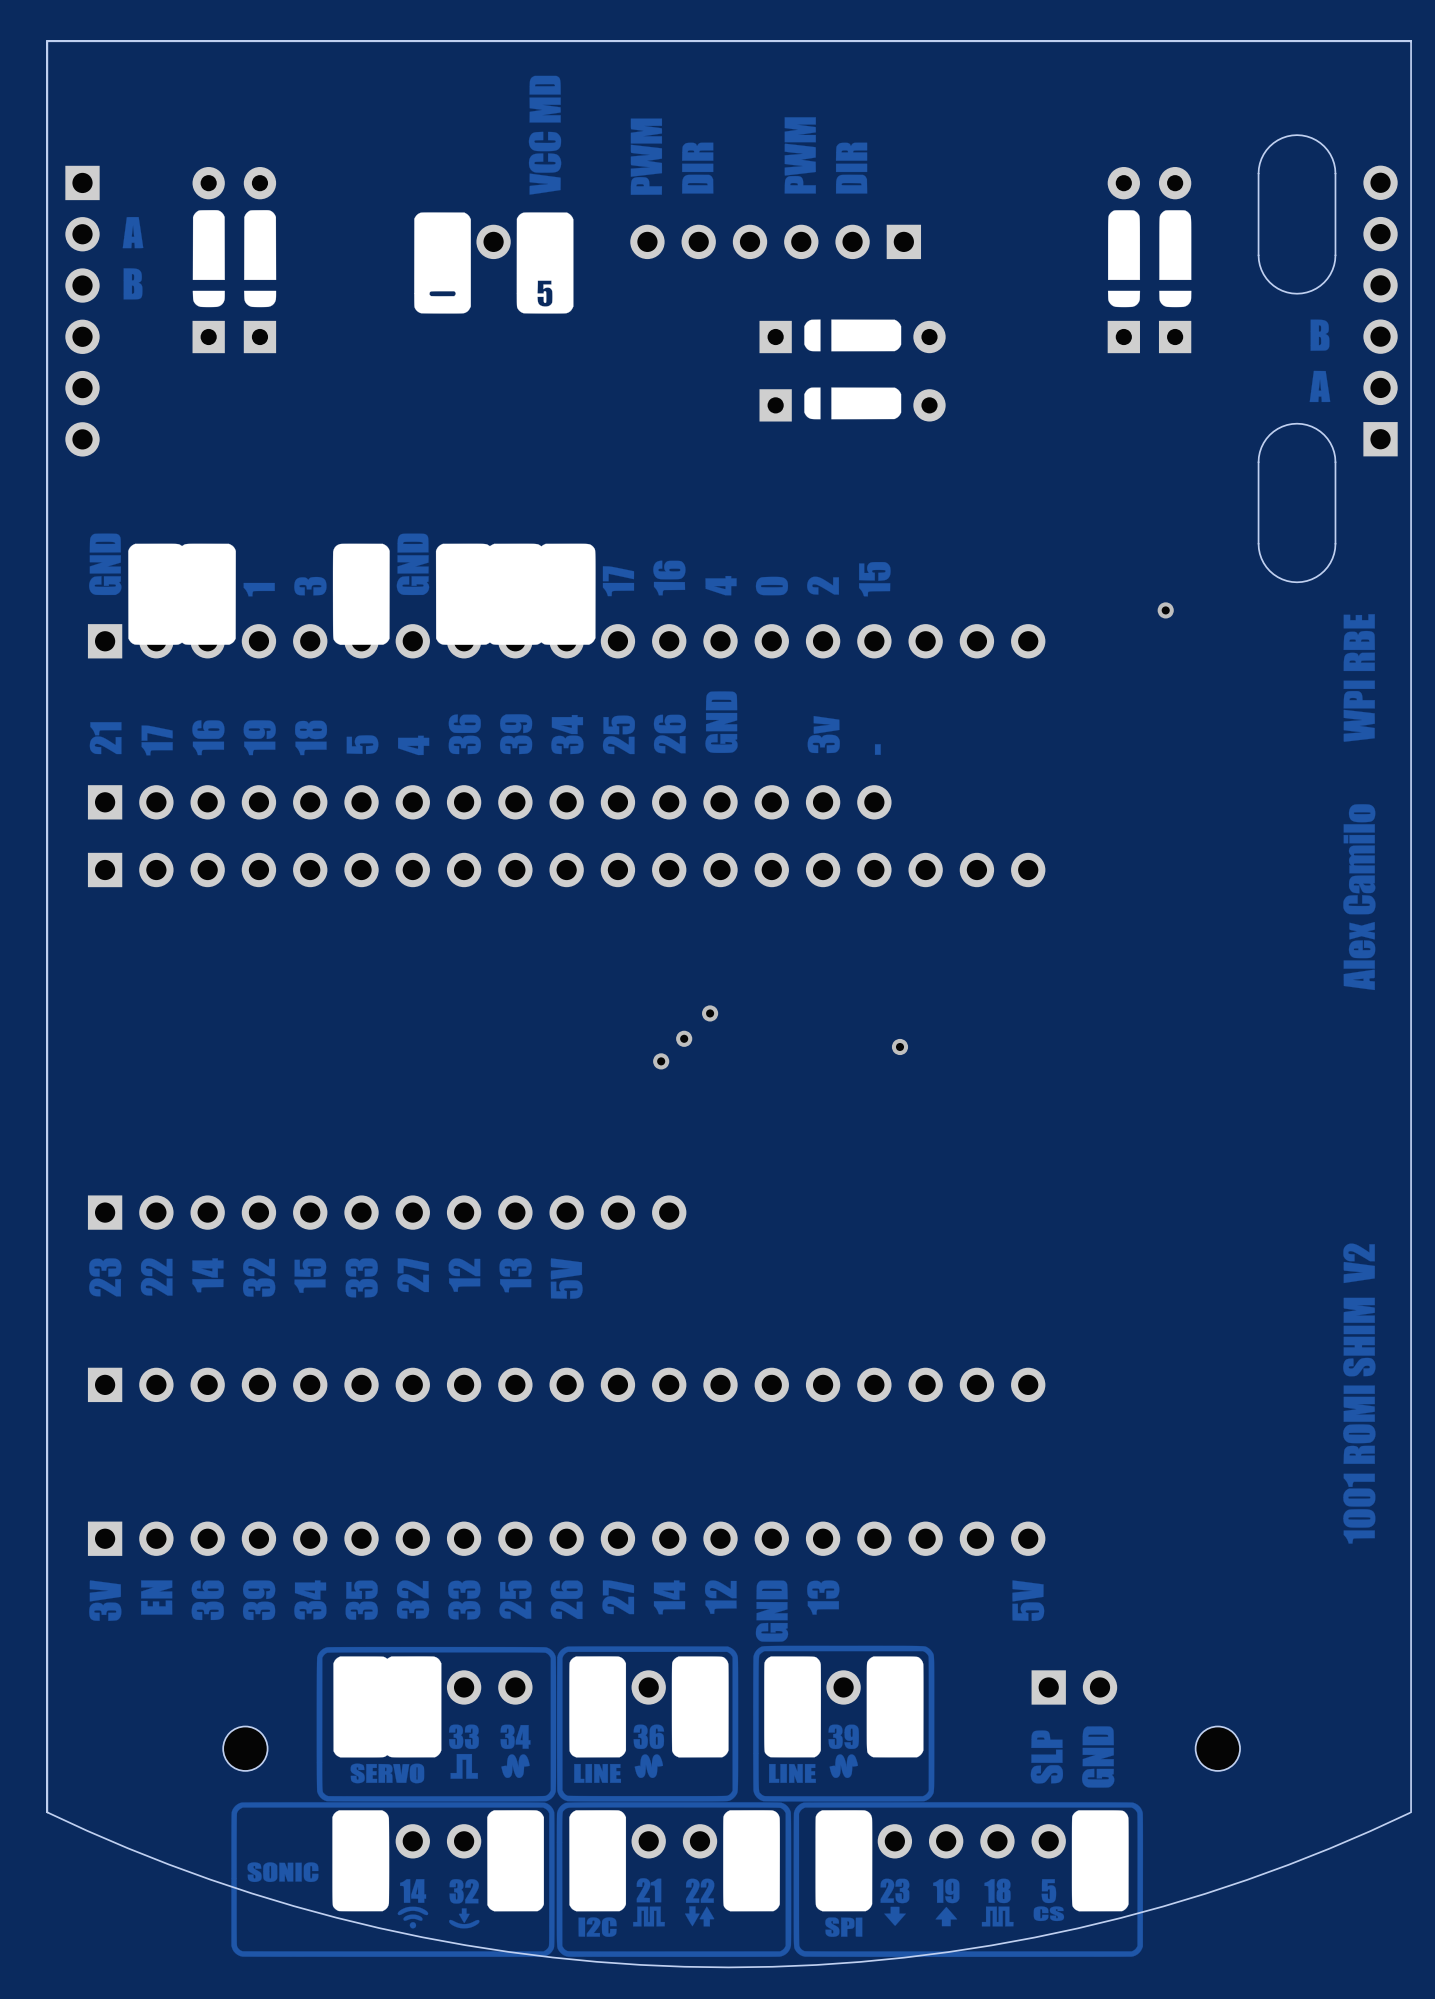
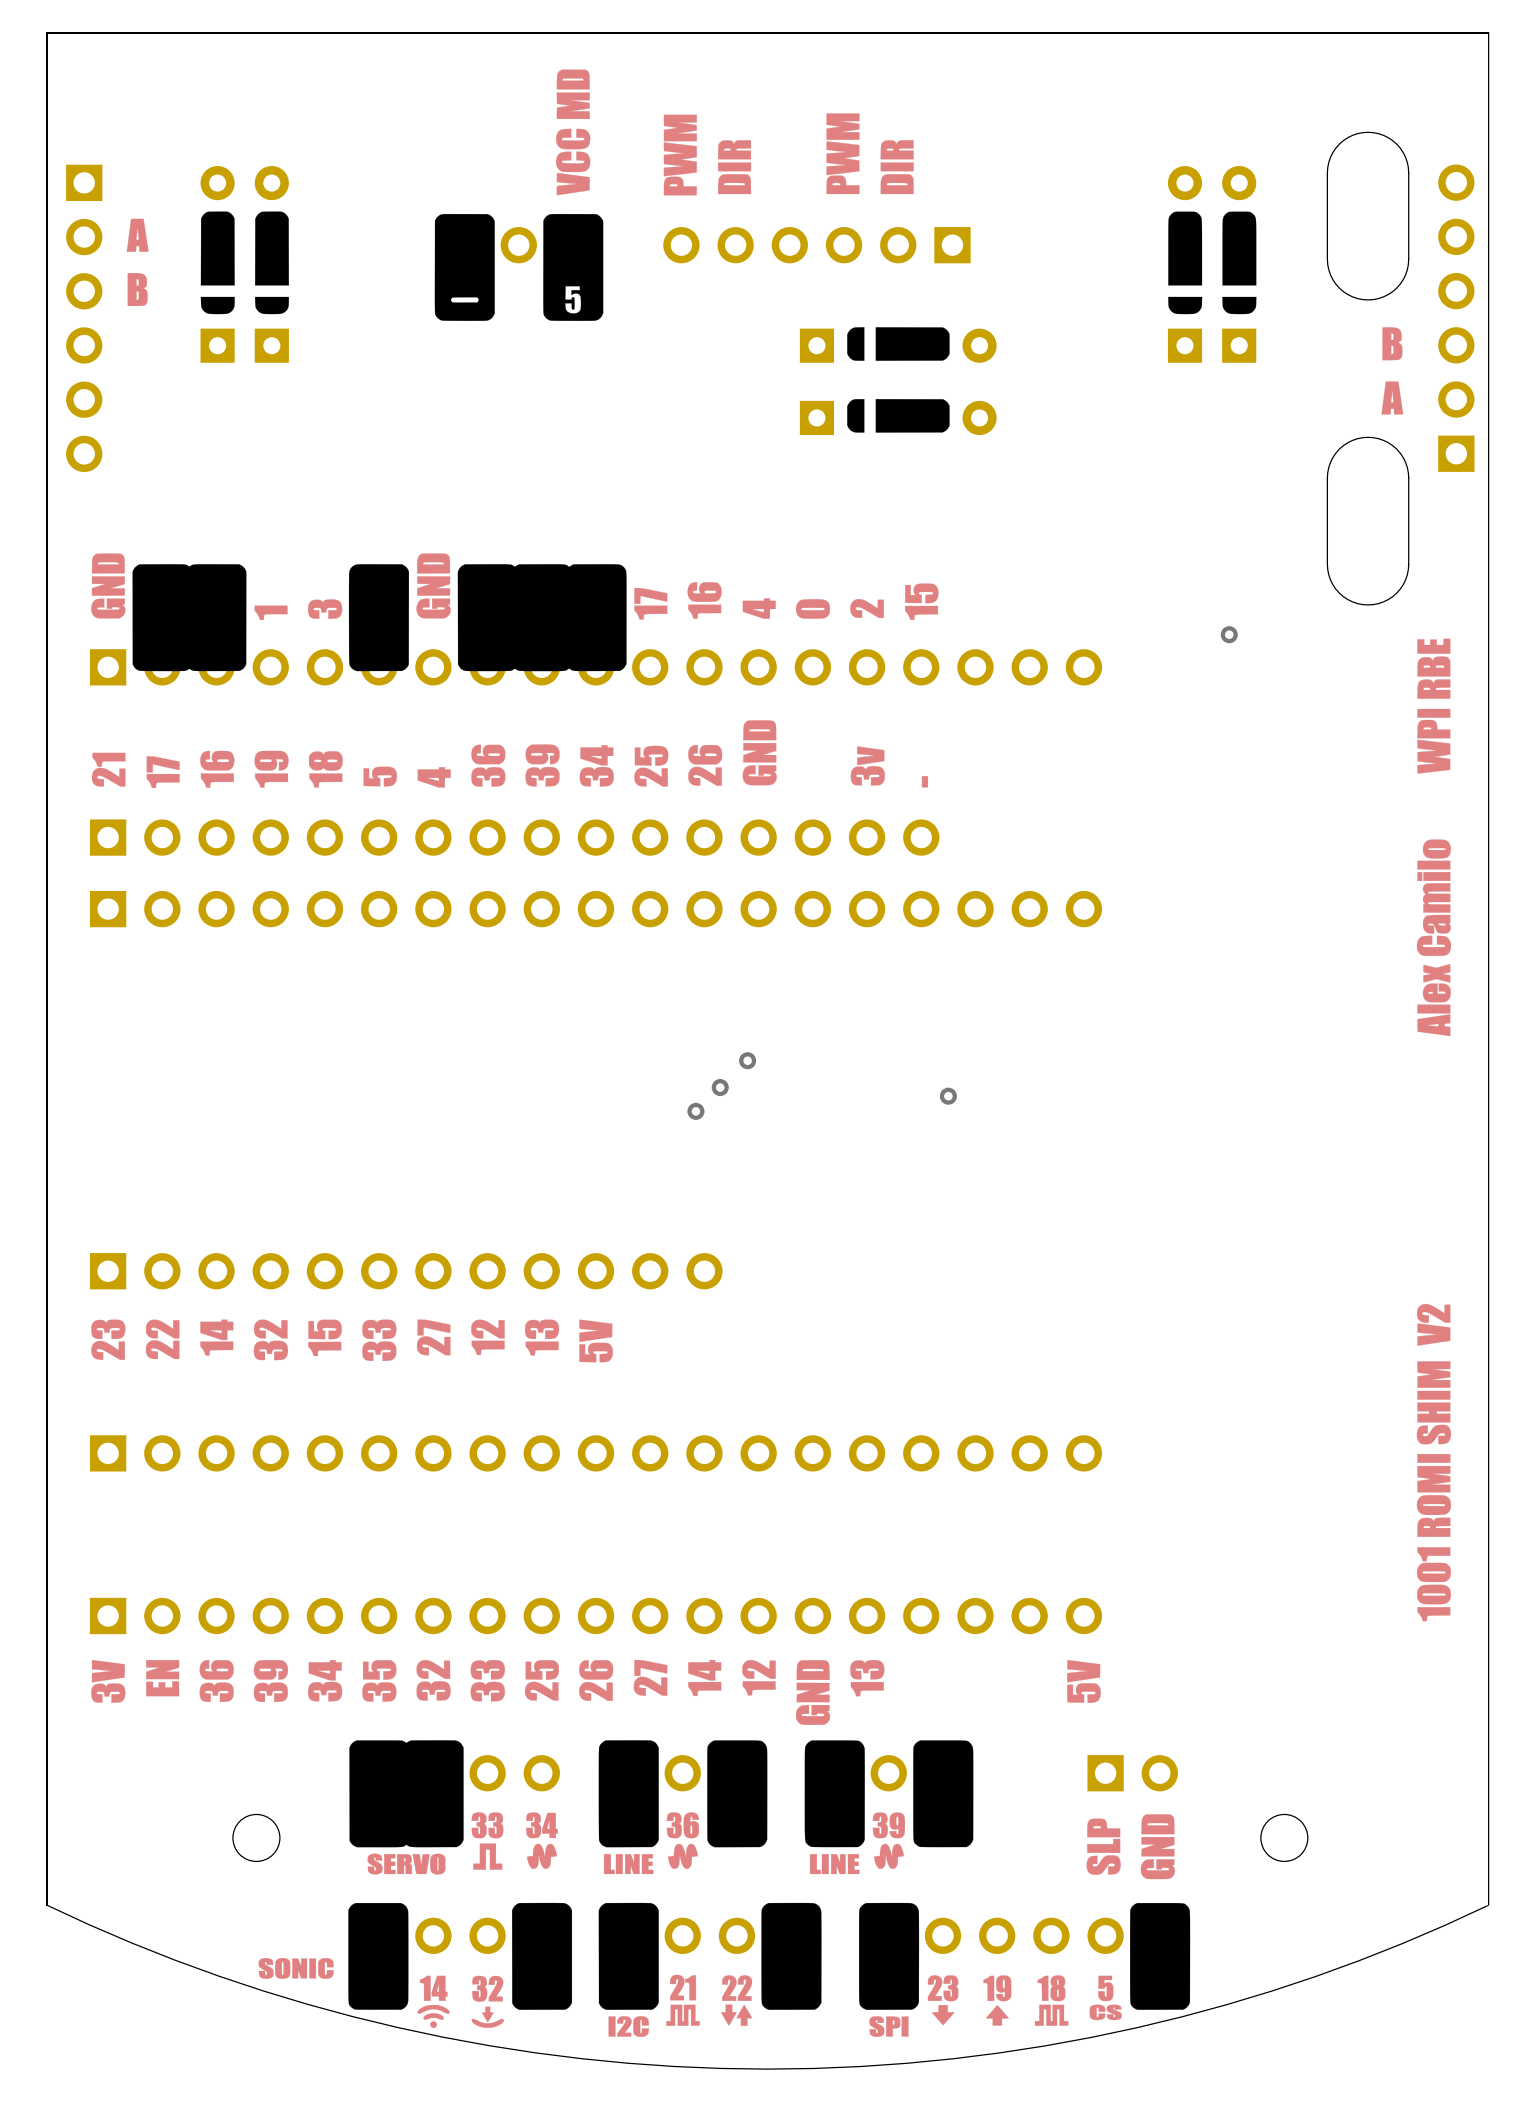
drawing shape: [89, 75, 1376, 1957] -> [91, 69, 1452, 2037]

